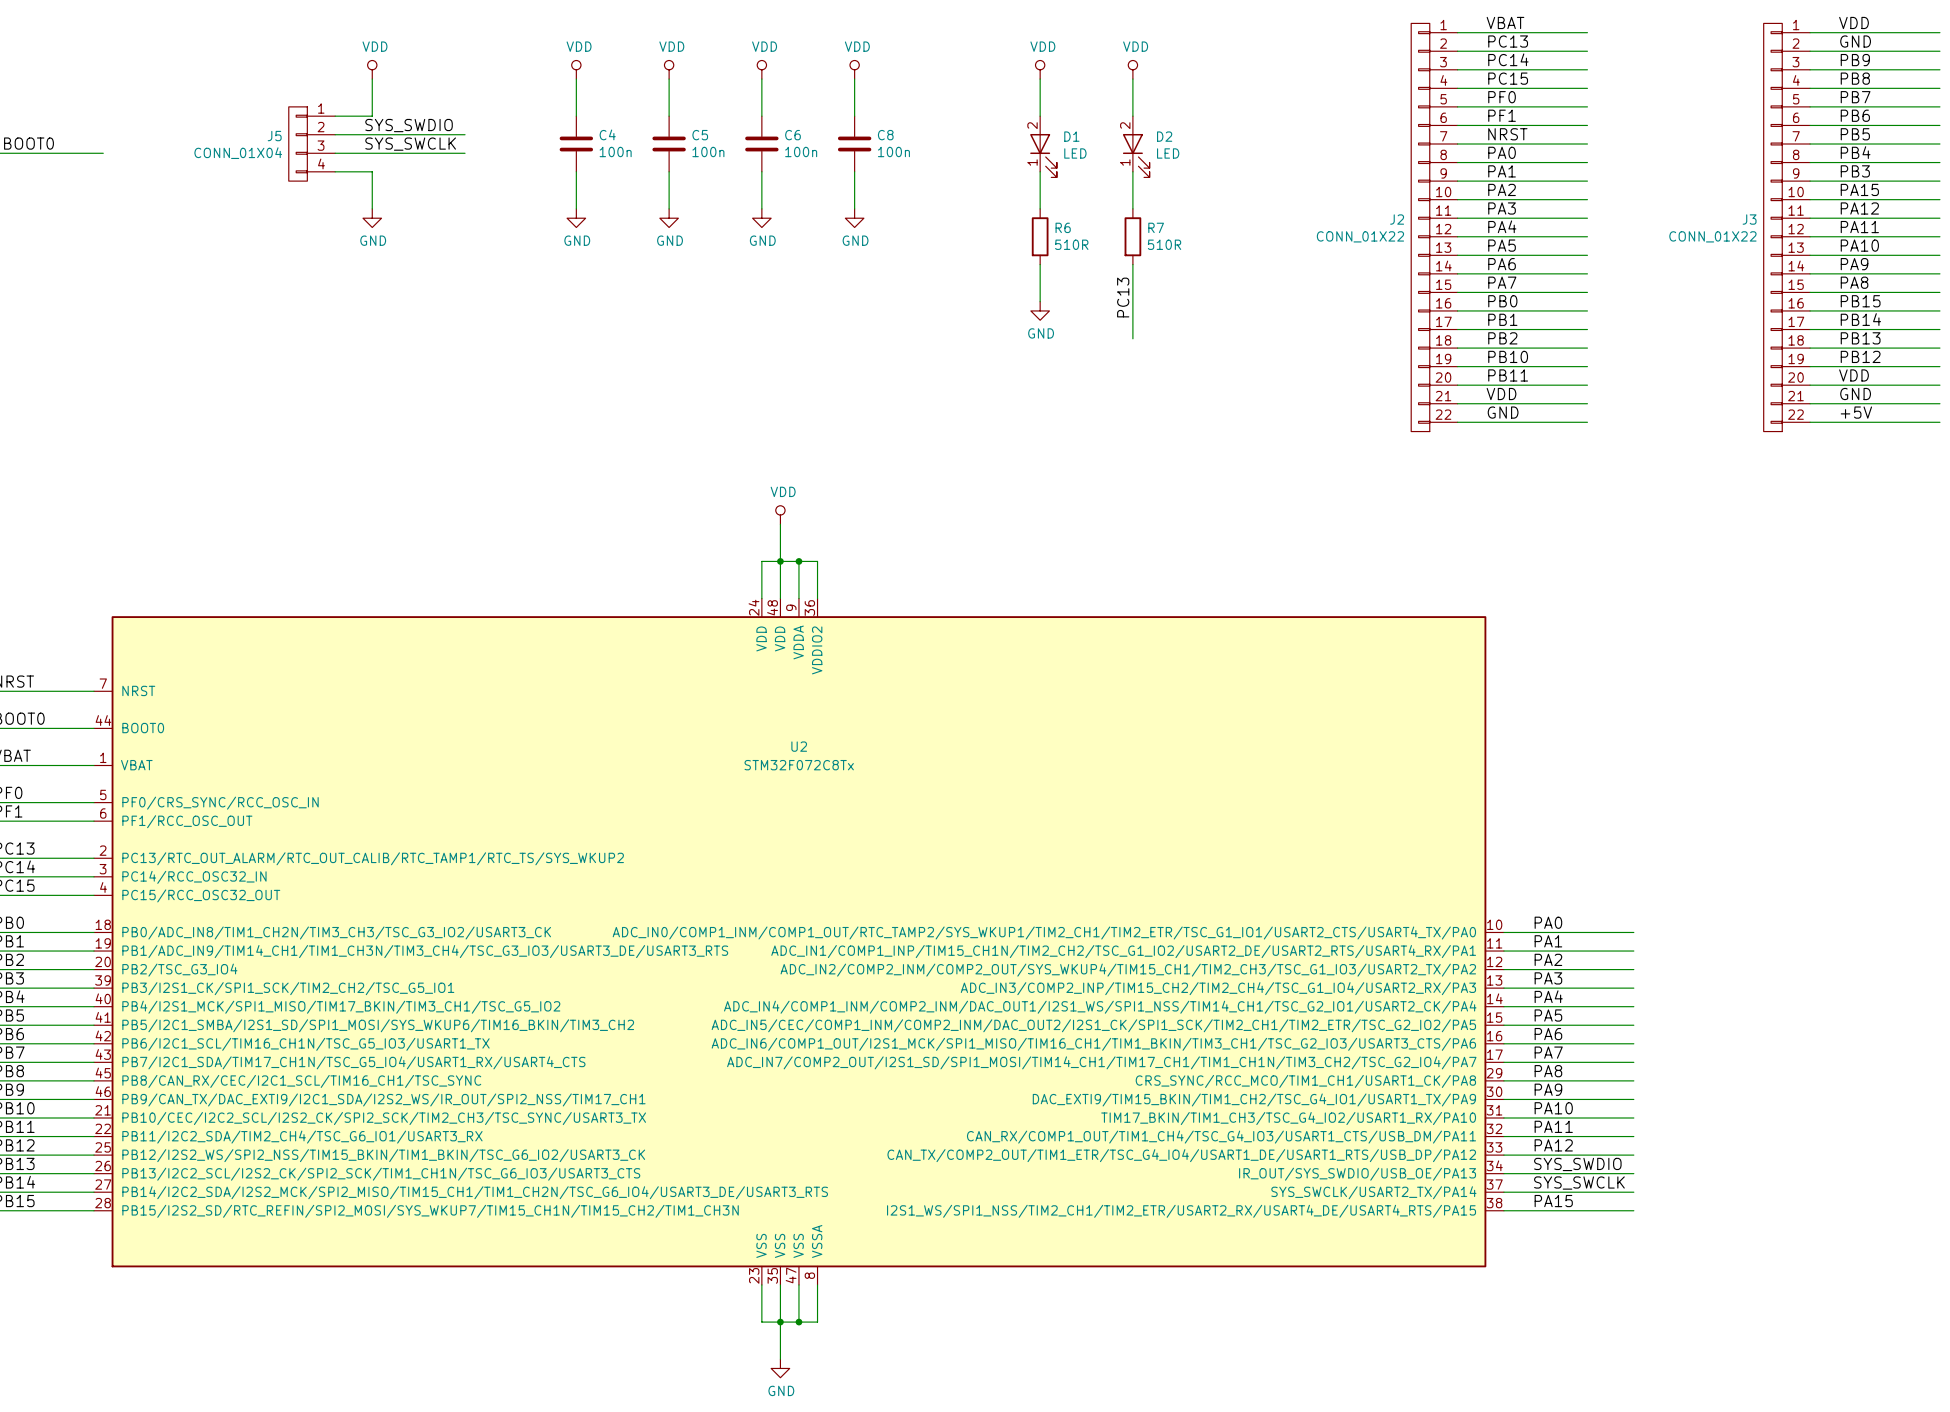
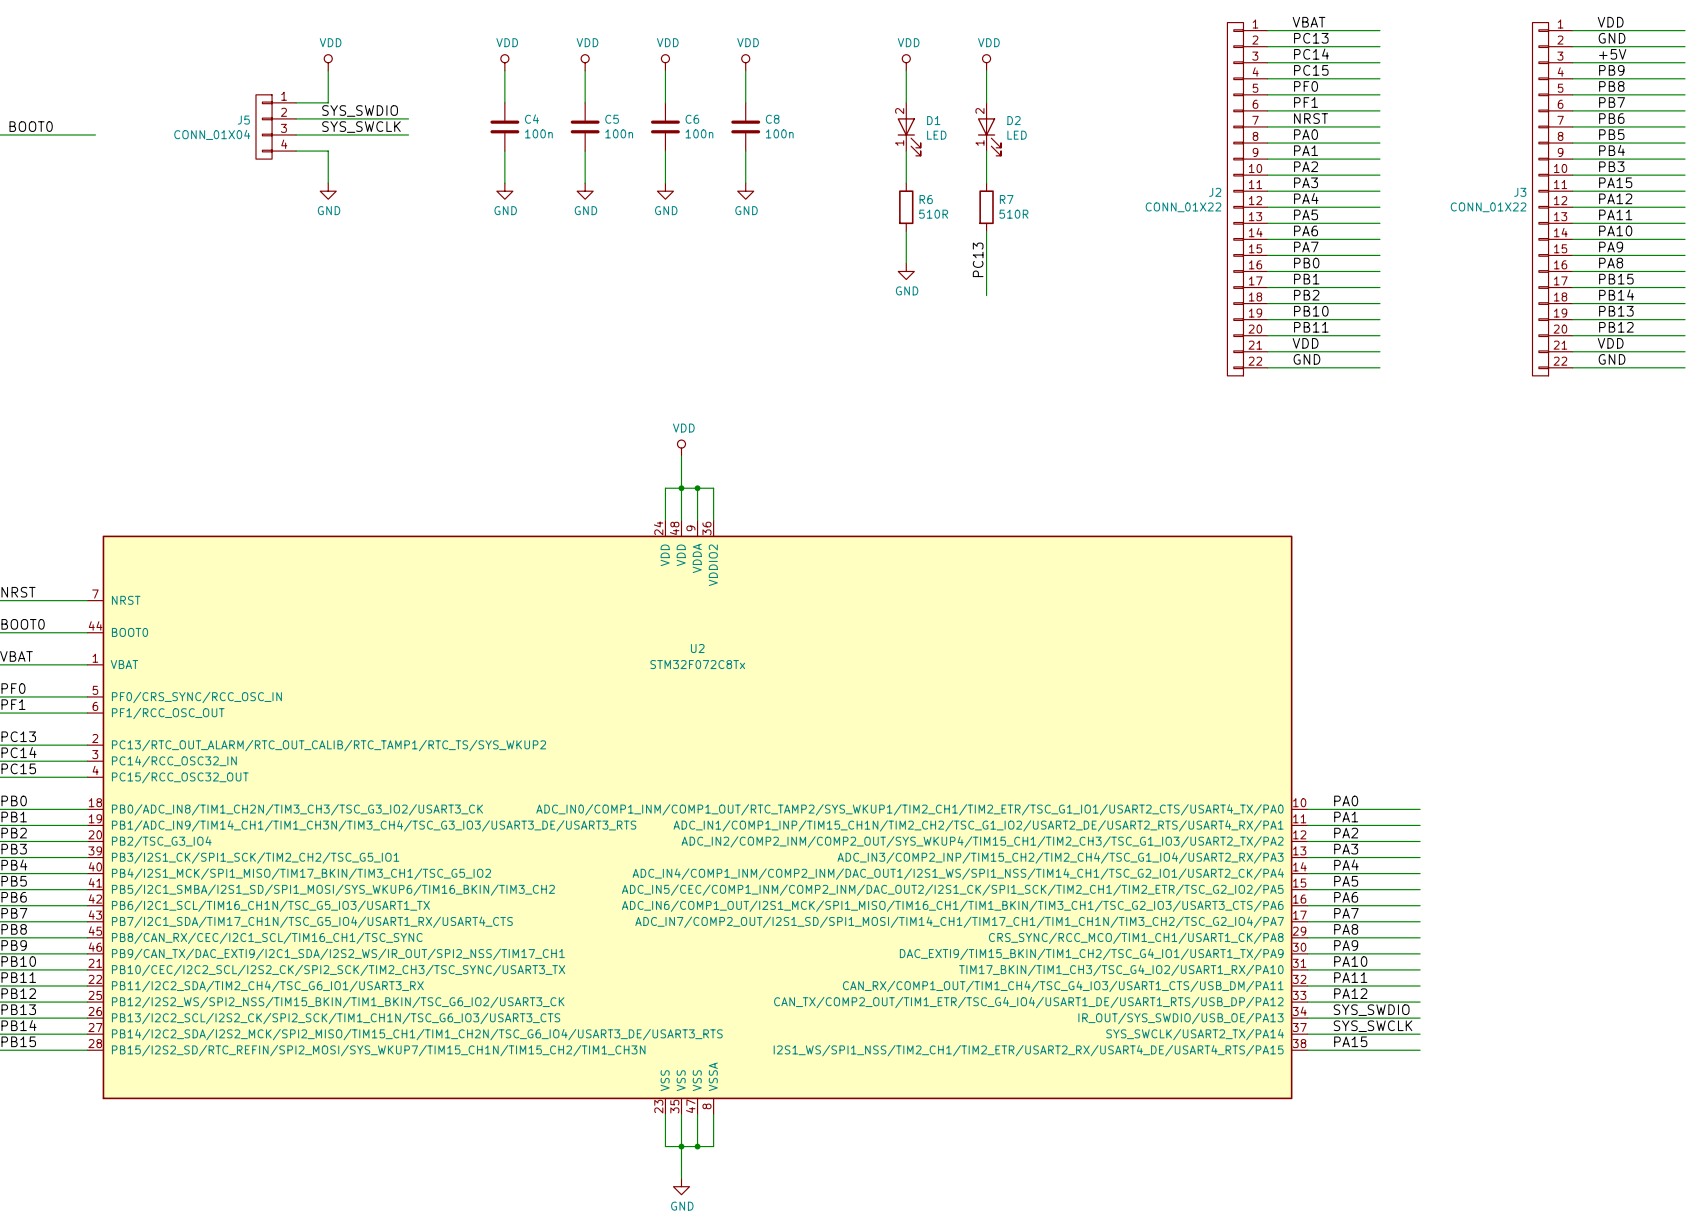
label: PB9 (1855, 60) -> +5V (1612, 54)
label: PB8 (1855, 78) -> PB9 (1611, 70)
label: PB7 (1855, 97) -> PB8 (1611, 86)
label: PB6 (1855, 115) -> PB7 (1612, 102)
label: PB5 (1855, 134) -> PB6 (1611, 118)
label: PB4 (1855, 152) -> PB5 (1611, 134)
label: PB3 (1855, 171) -> PB4 (1612, 150)
label: PA15 (1859, 189) -> PB3 (1611, 166)
label: PA12 (1859, 208) -> PA15 (1615, 182)
label: PA11 (1859, 227) -> PA12 (1615, 198)
label: PA10 (1859, 245) -> PA11 (1615, 214)
label: PA9 (1854, 264) -> PA10 (1615, 230)
label: PA8 (1854, 282) -> PA9 (1611, 247)
label: PB15 (1860, 301) -> PA8 (1611, 263)
label: PB14 (1860, 319) -> PB15 (1616, 279)
label: PB13 (1860, 338) -> PB14 (1616, 294)
label: PB12 (1860, 356) -> PB13 (1616, 311)
label: VDD (1854, 375) -> PB12 (1616, 327)
label: GND (1855, 394) -> VDD (1610, 343)
label: +5V (1856, 412) -> GND (1612, 359)

